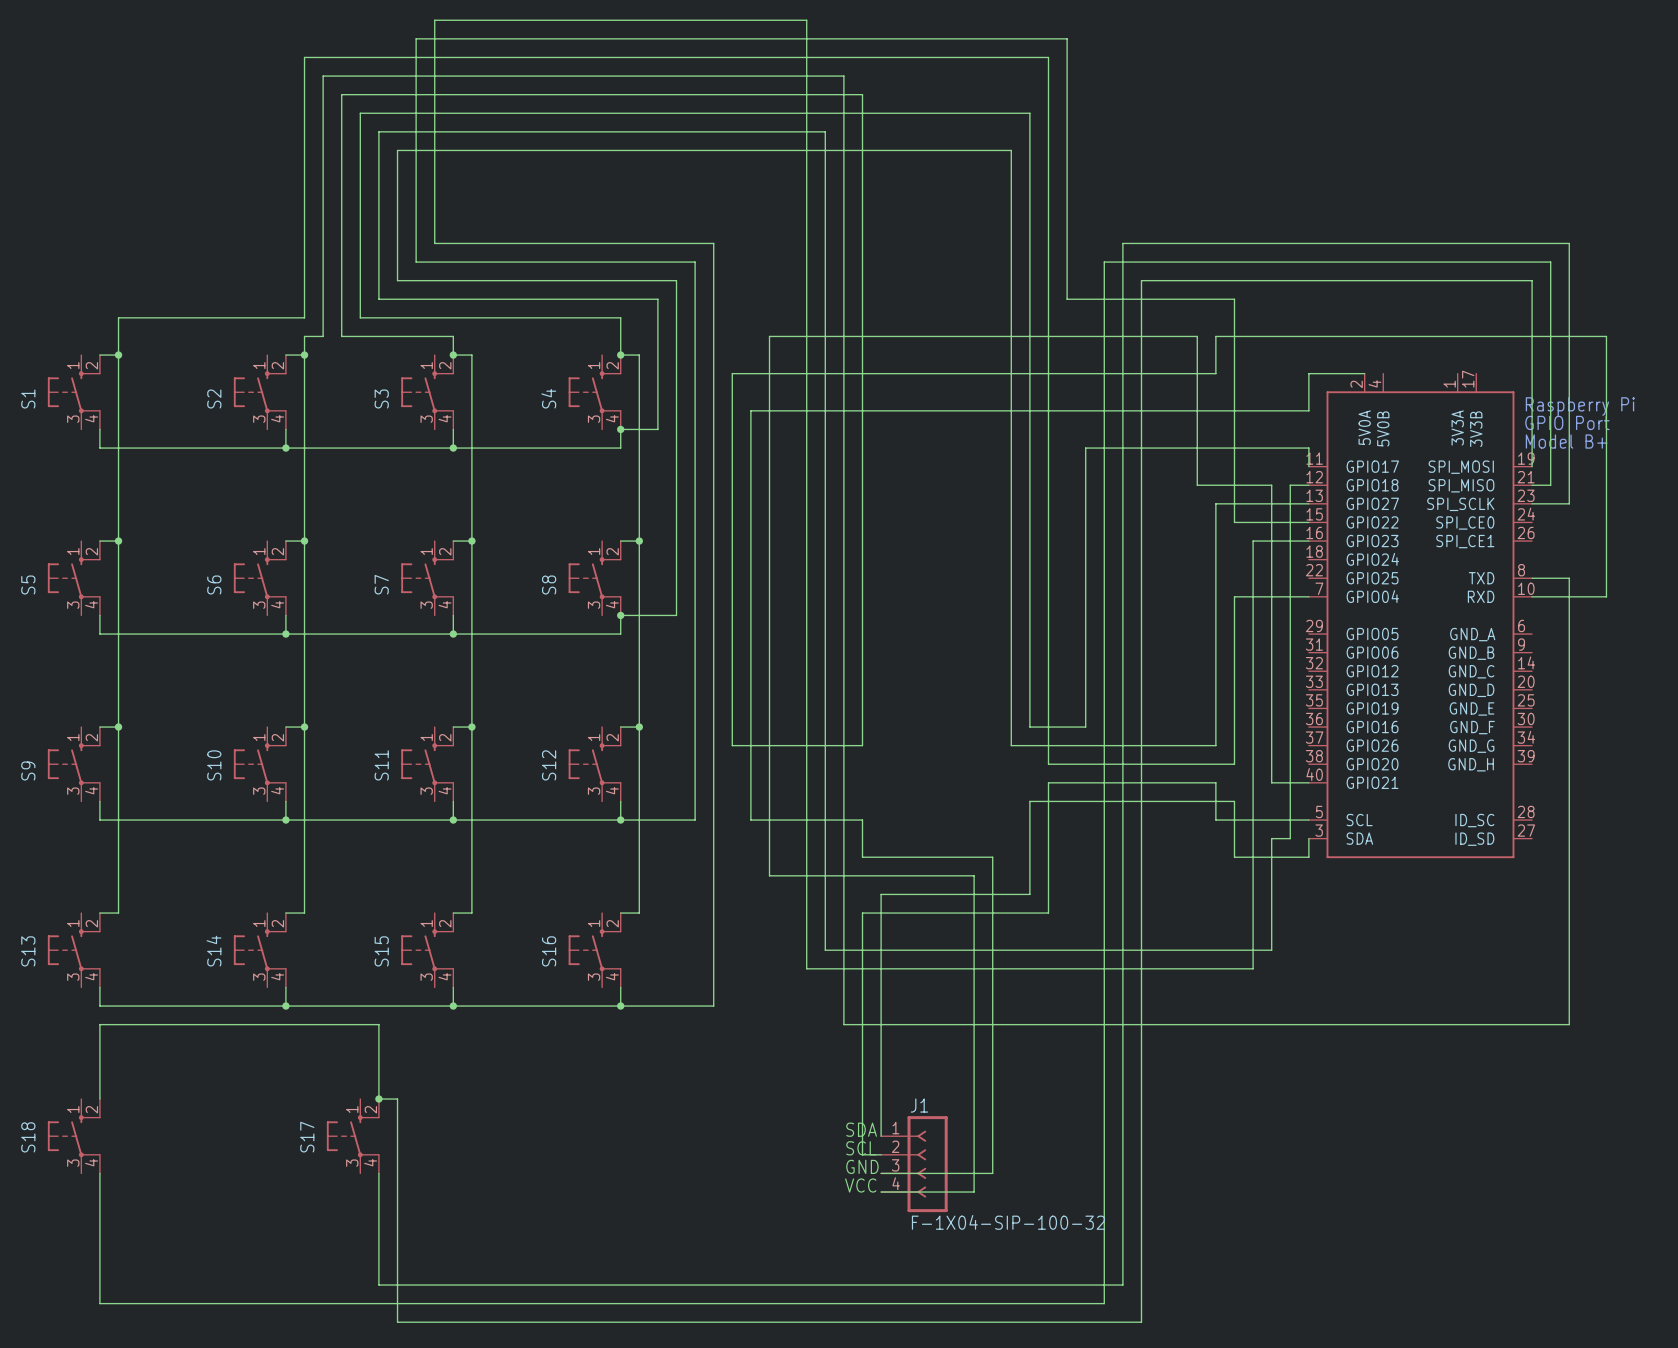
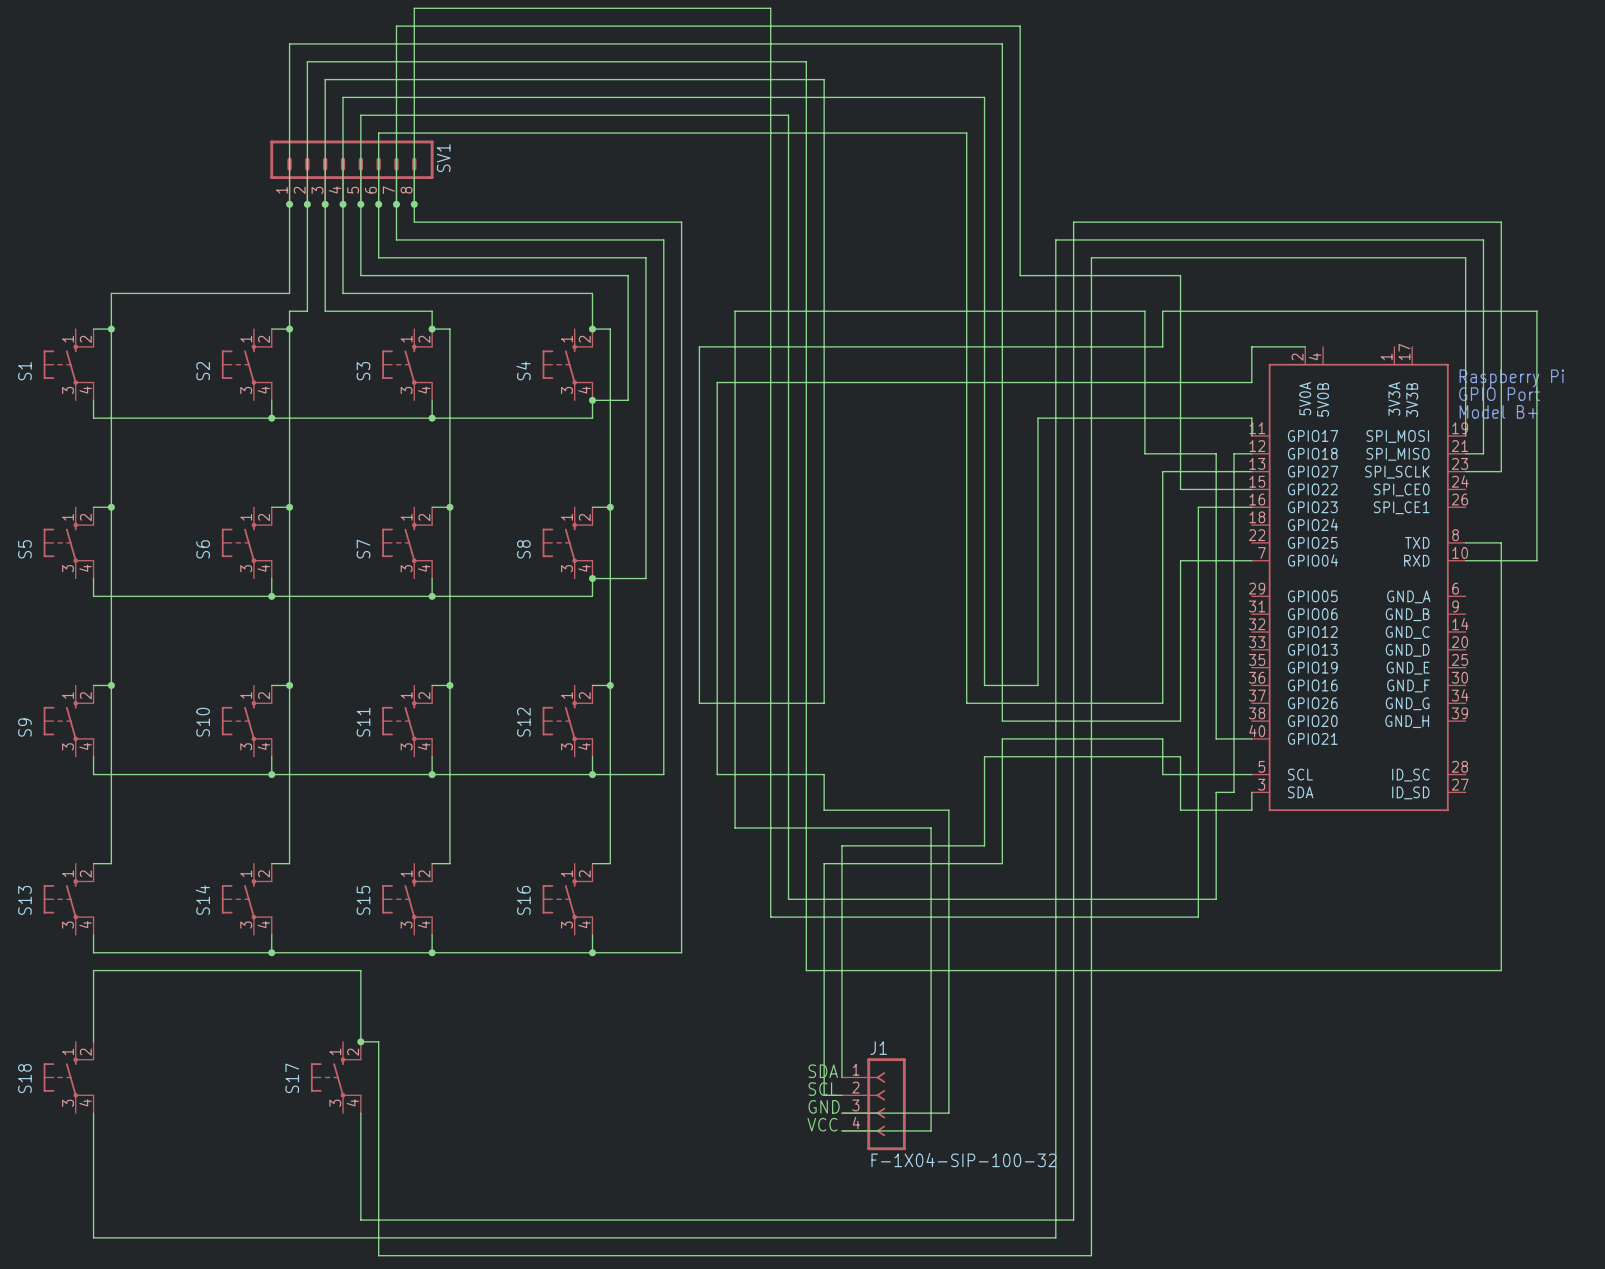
SV1: none -> (351, 172)
junction: none -> (289, 204)
junction: none -> (307, 204)
junction: none -> (325, 204)
junction: none -> (343, 204)
junction: none -> (360, 204)
junction: none -> (378, 204)
junction: none -> (396, 204)
junction: none -> (414, 204)

